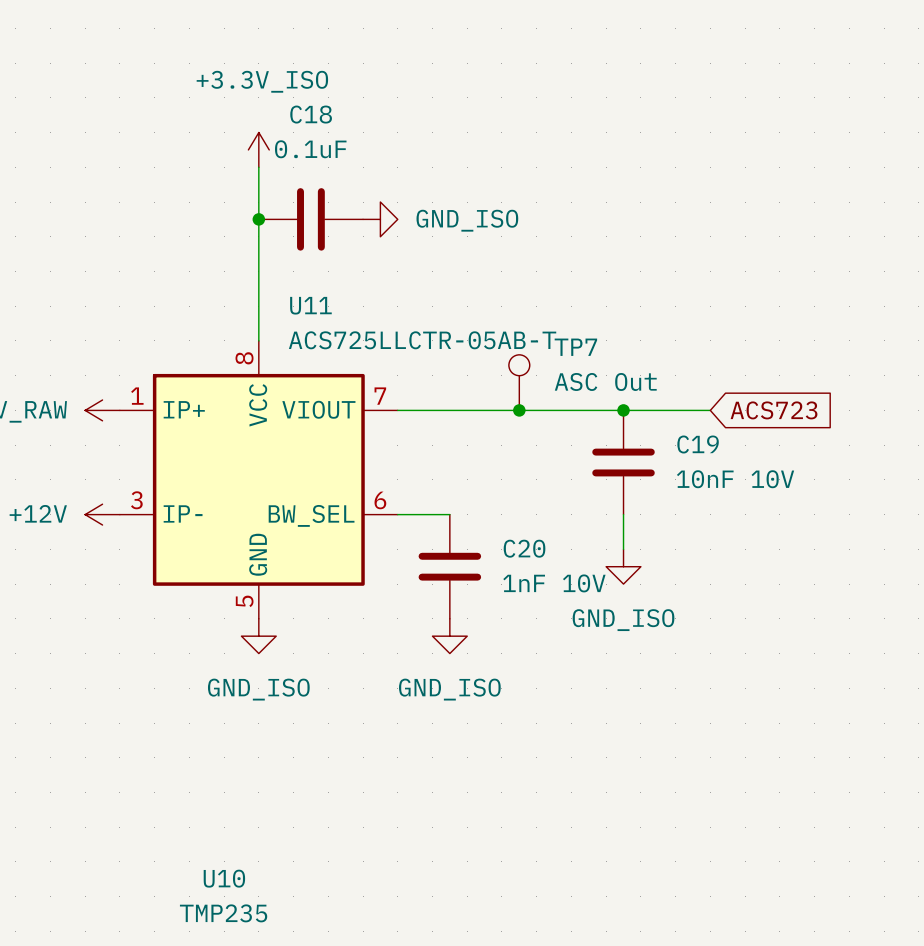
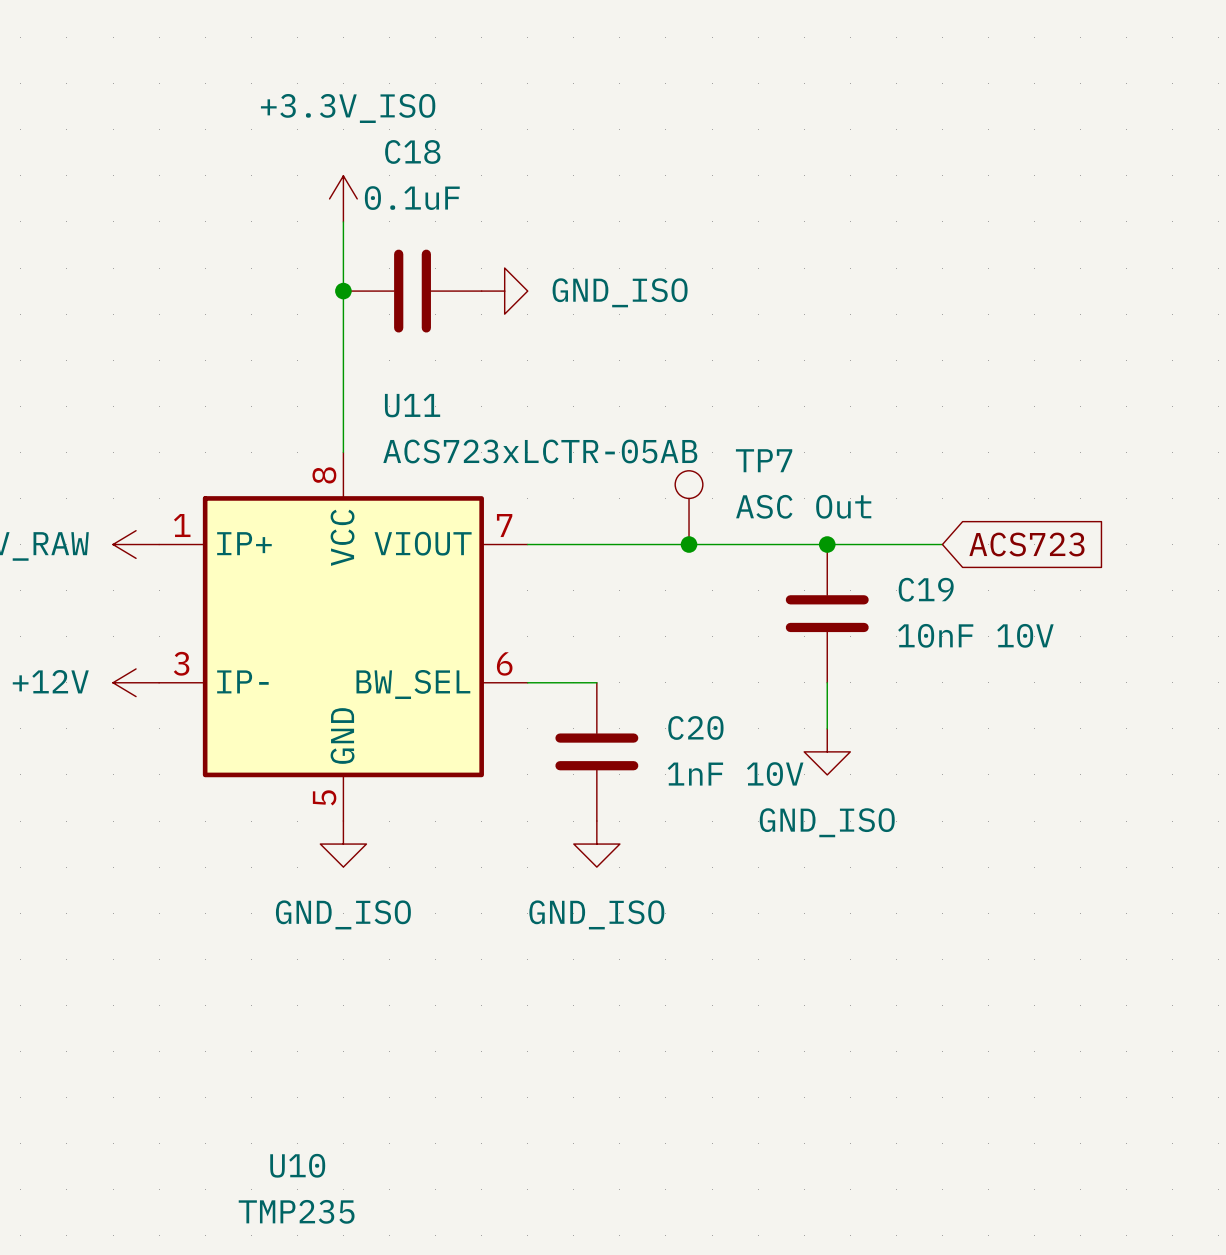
U11 value: ACS725LLCTR-05AB-T (422, 340) -> ACS723xLCTR-05AB (540, 451)

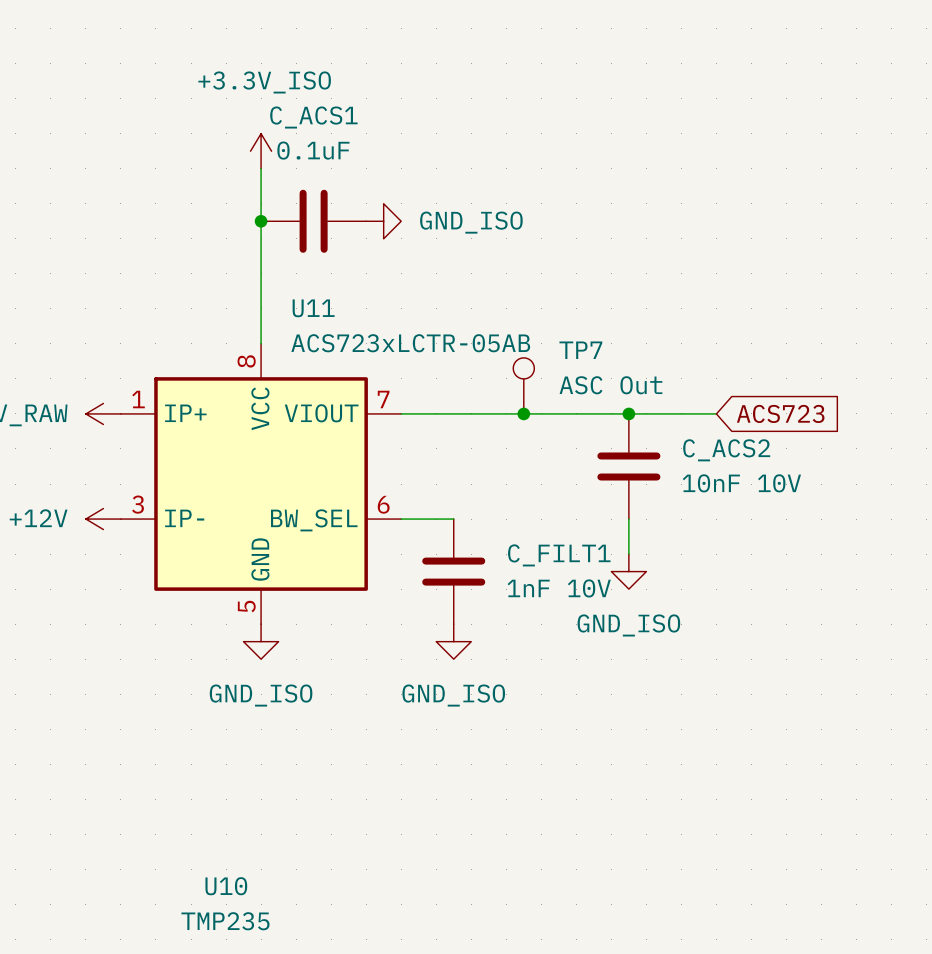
C18 name: C18 (412, 151) -> C_ACS1 (313, 117)
C19 name: C19 (926, 589) -> C_ACS2 (726, 450)
C20 name: C20 (695, 727) -> C_FILT1 (559, 555)

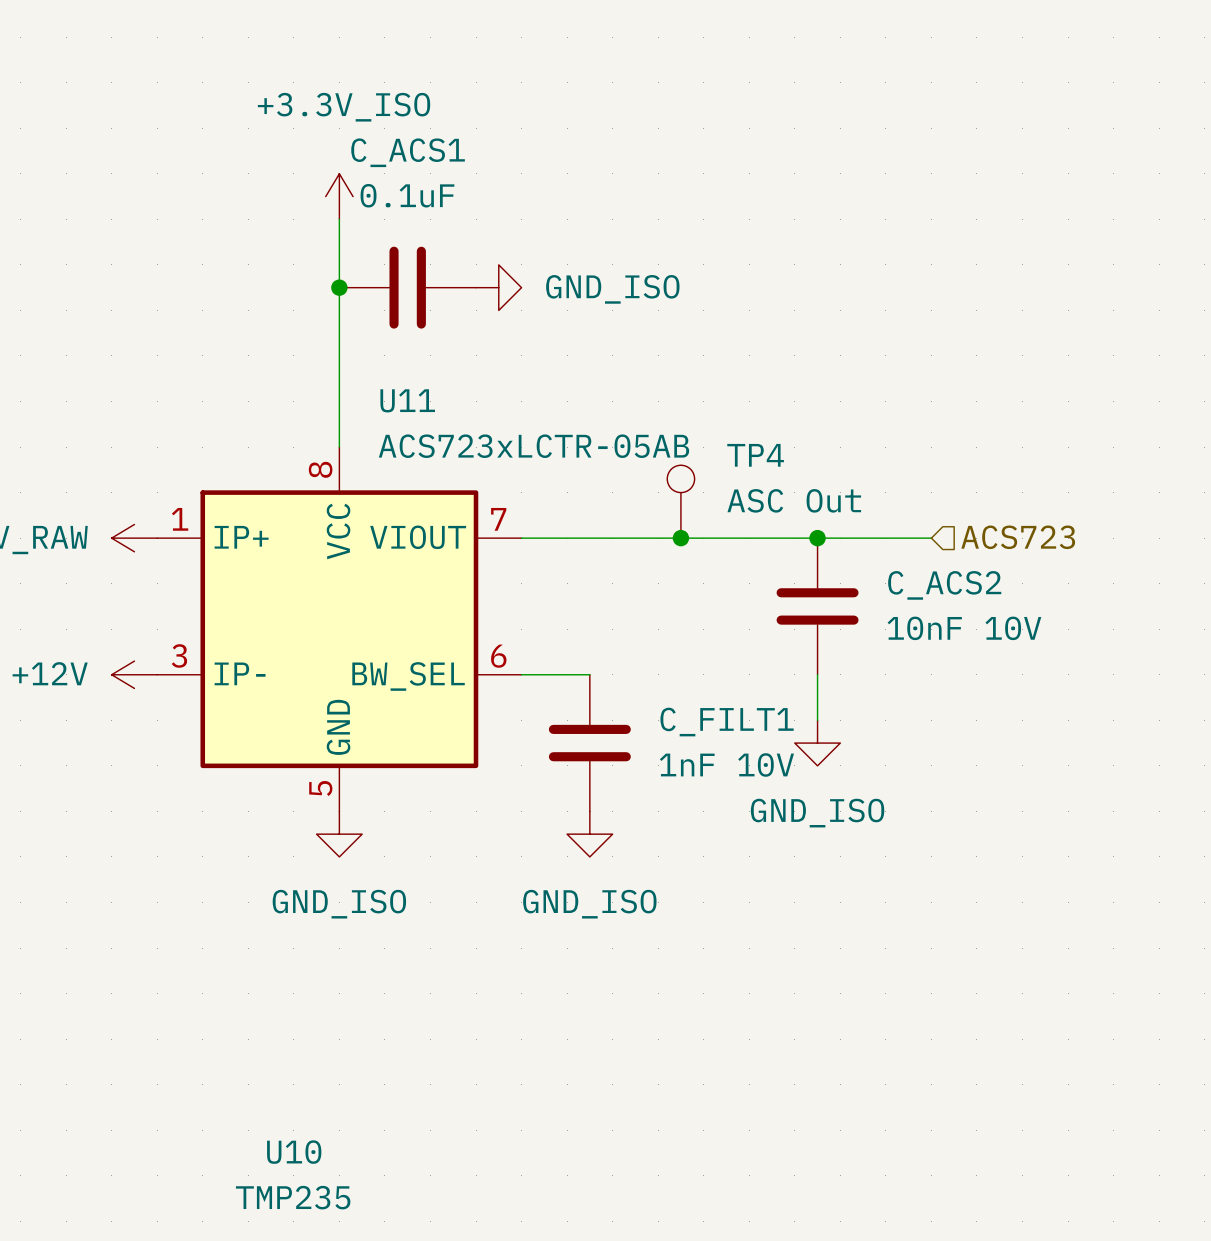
TP7 name: TP7 (580, 350) -> TP4 (755, 455)
global label: ACS723 (780, 413) -> none
hierarchical label: none -> ACS723 (1018, 537)

